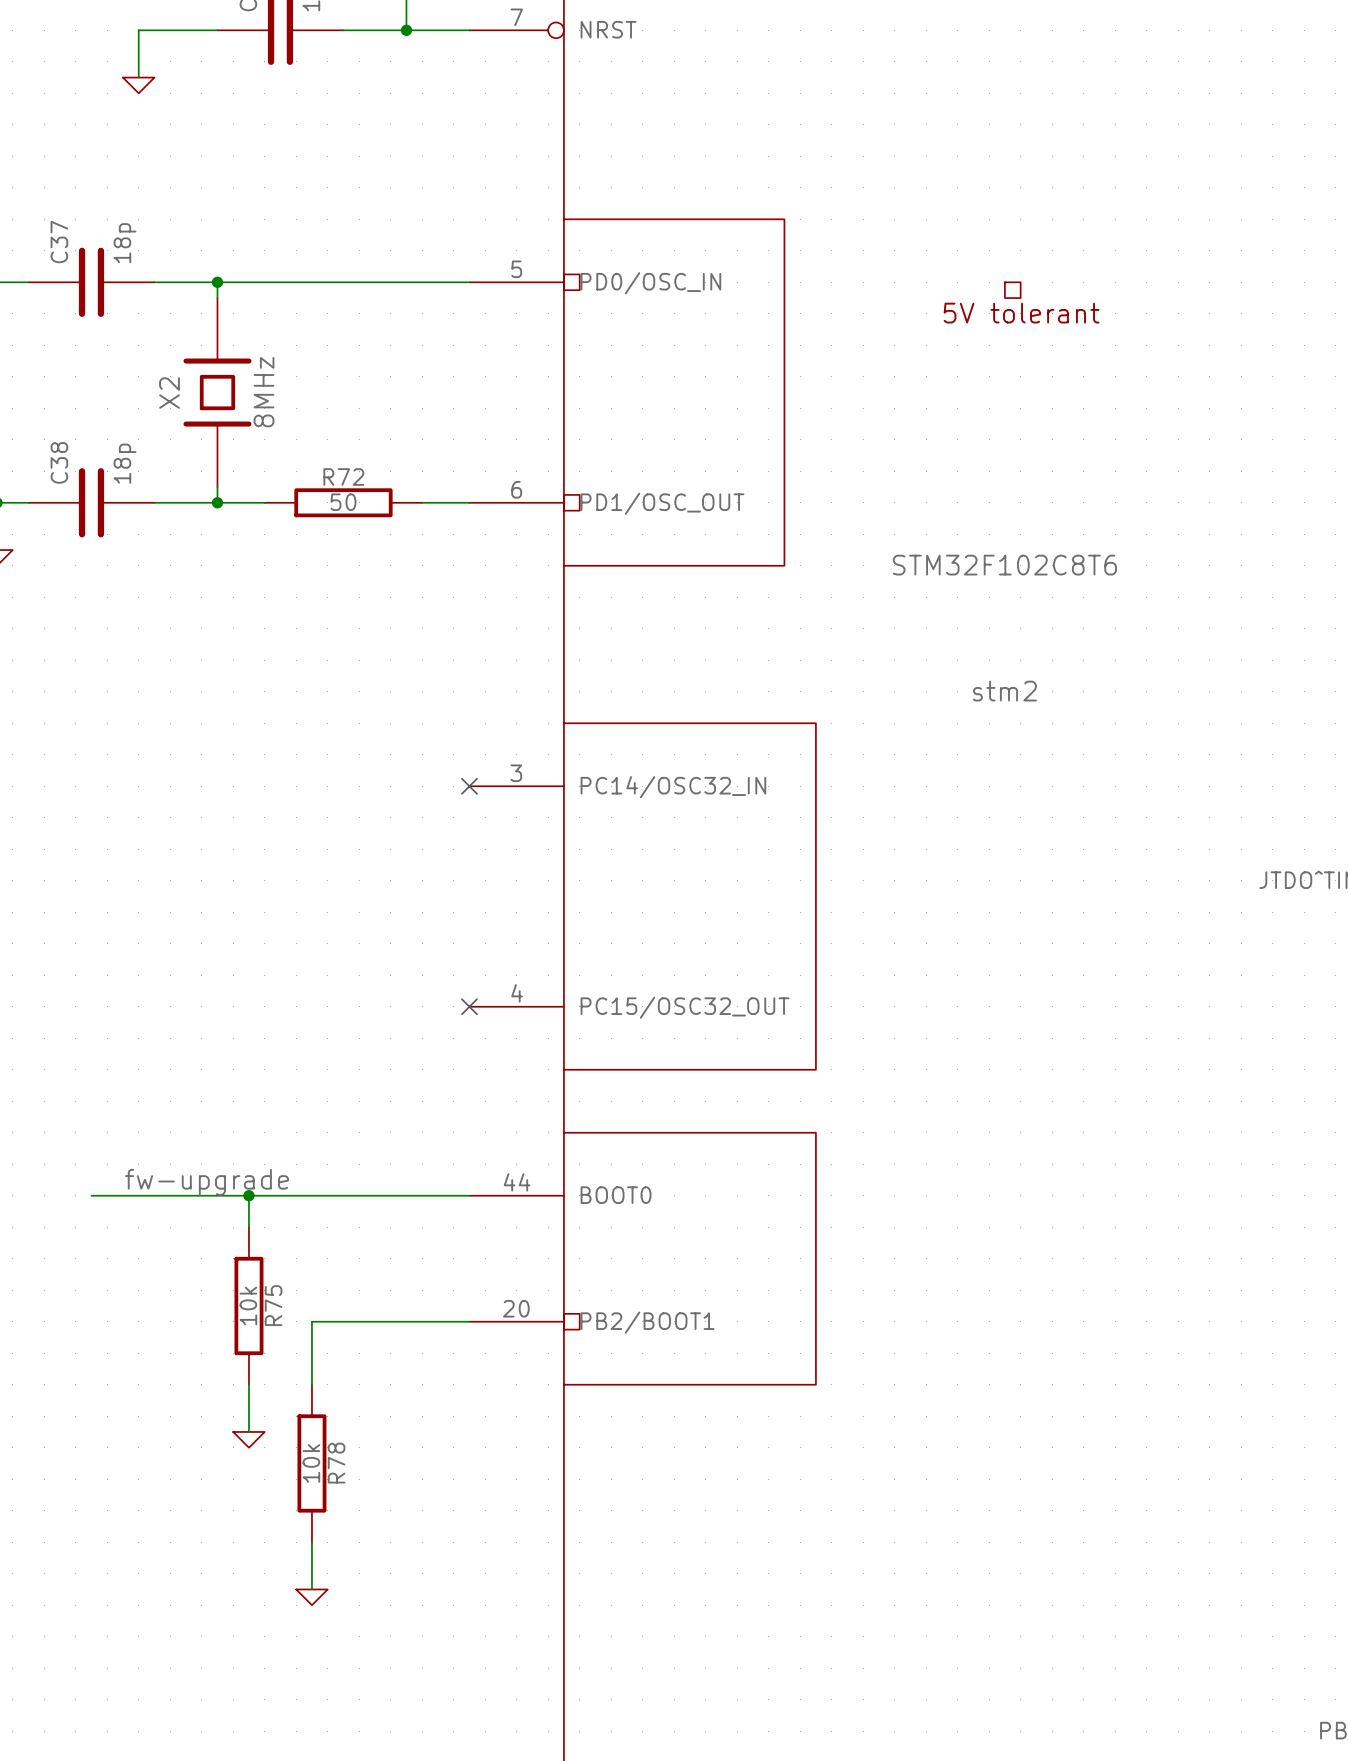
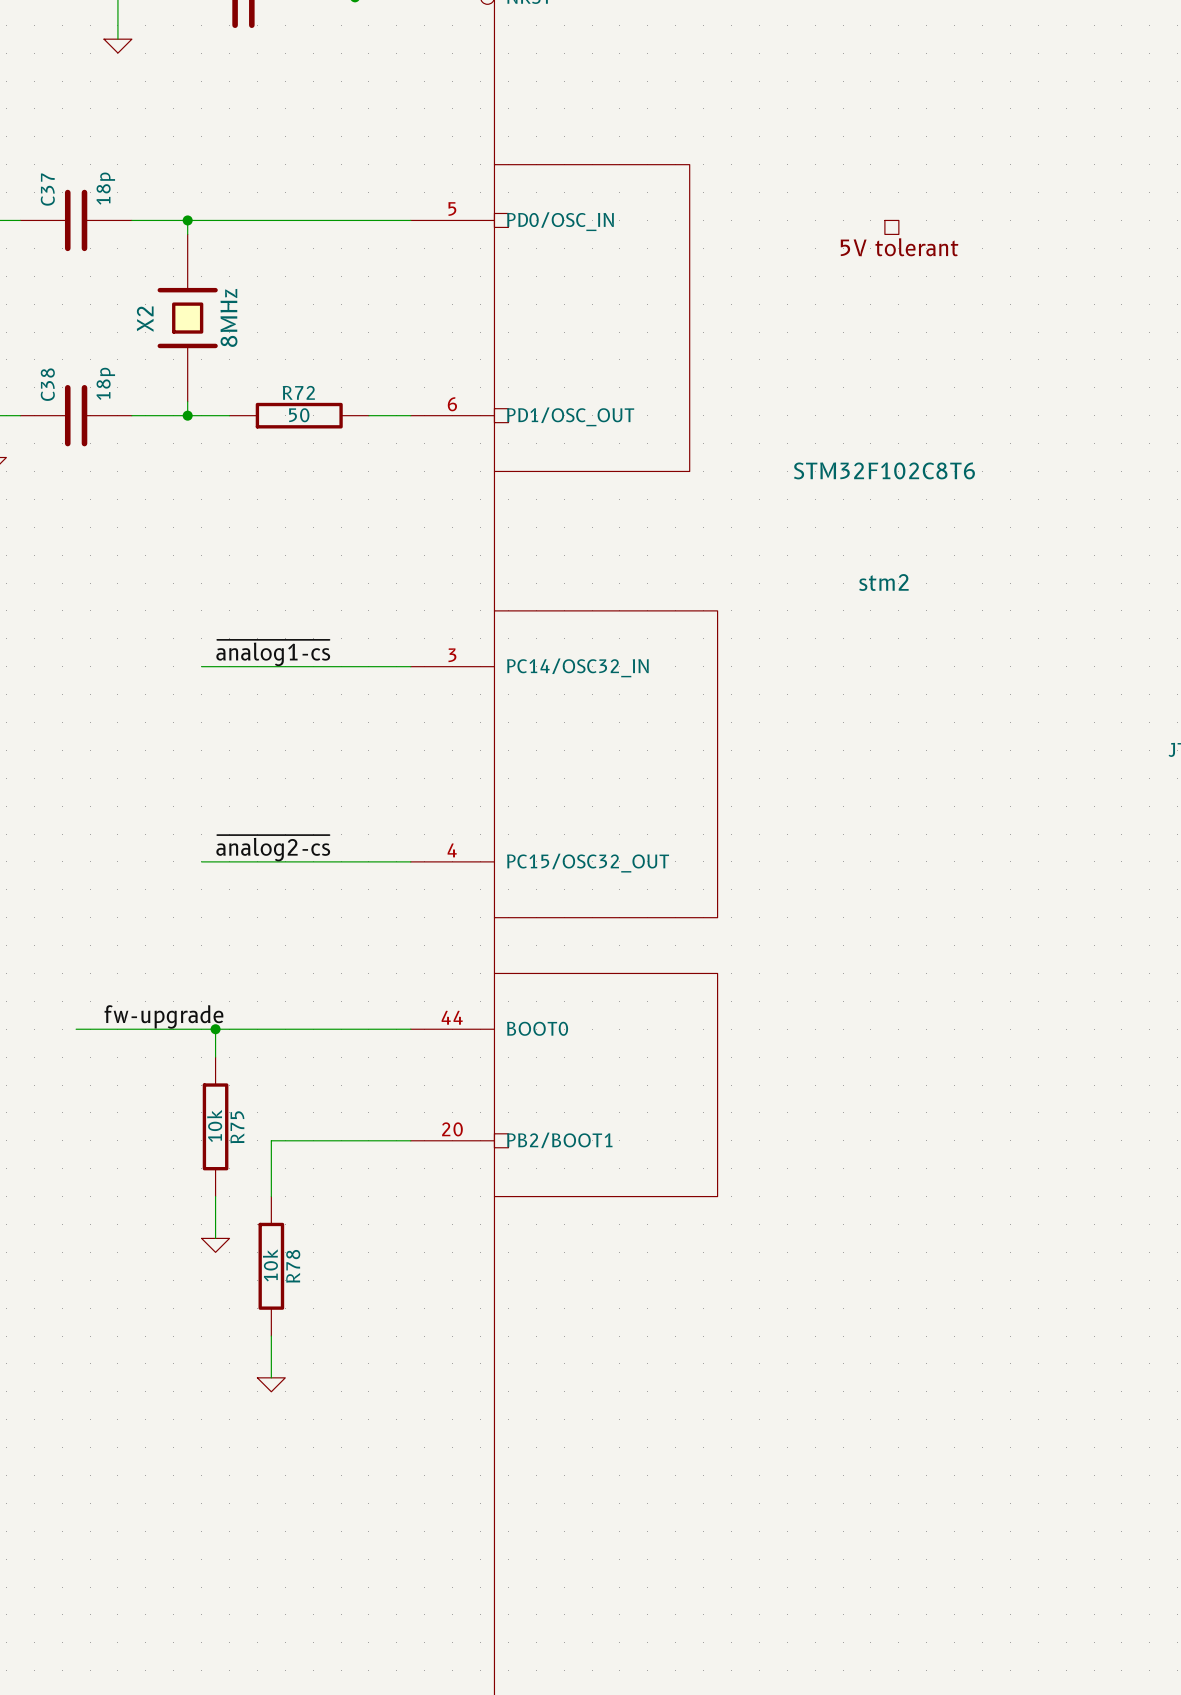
label: none -> ~{analog1-cs} (273, 653)
wire: none -> (201, 666) (410, 666)
no-connect mark: (469, 786) -> none
label: none -> ~{analog2-cs} (273, 848)
wire: none -> (201, 861) (410, 861)
no-connect mark: (469, 1006) -> none

